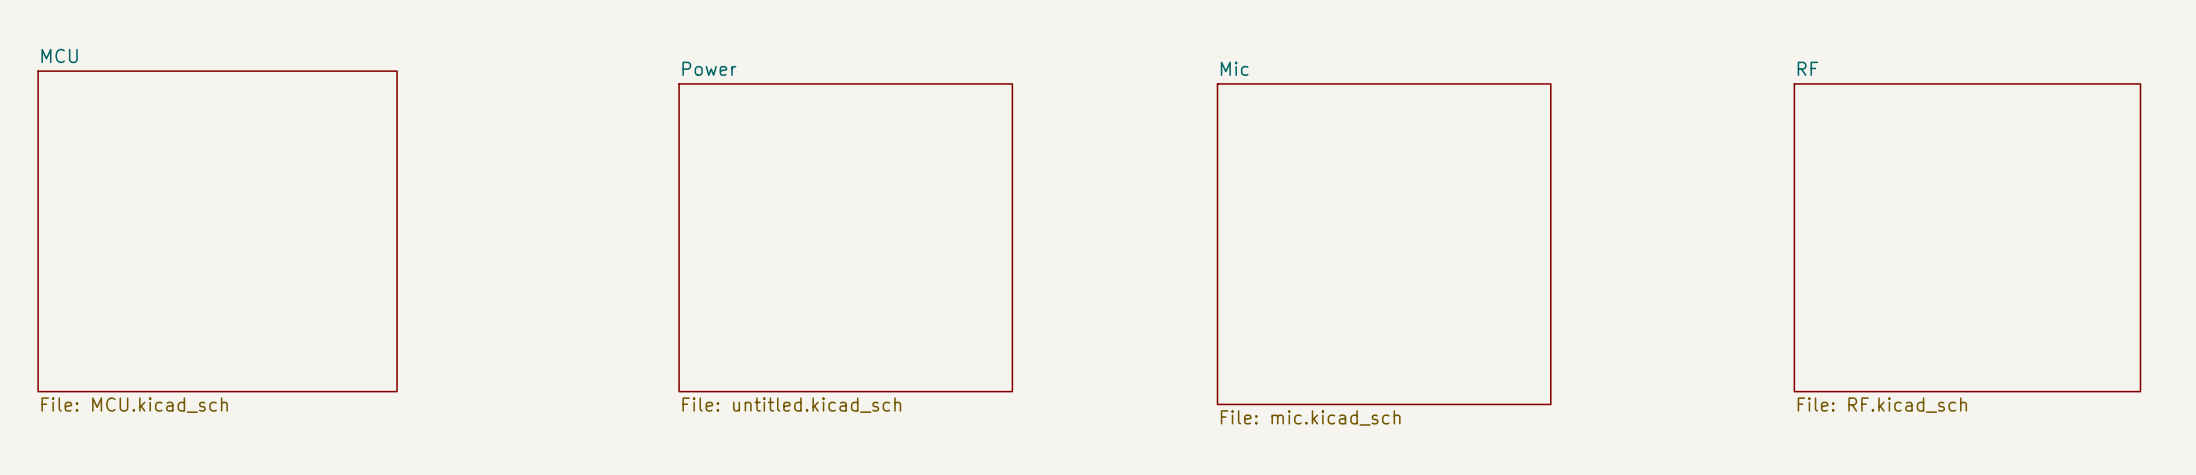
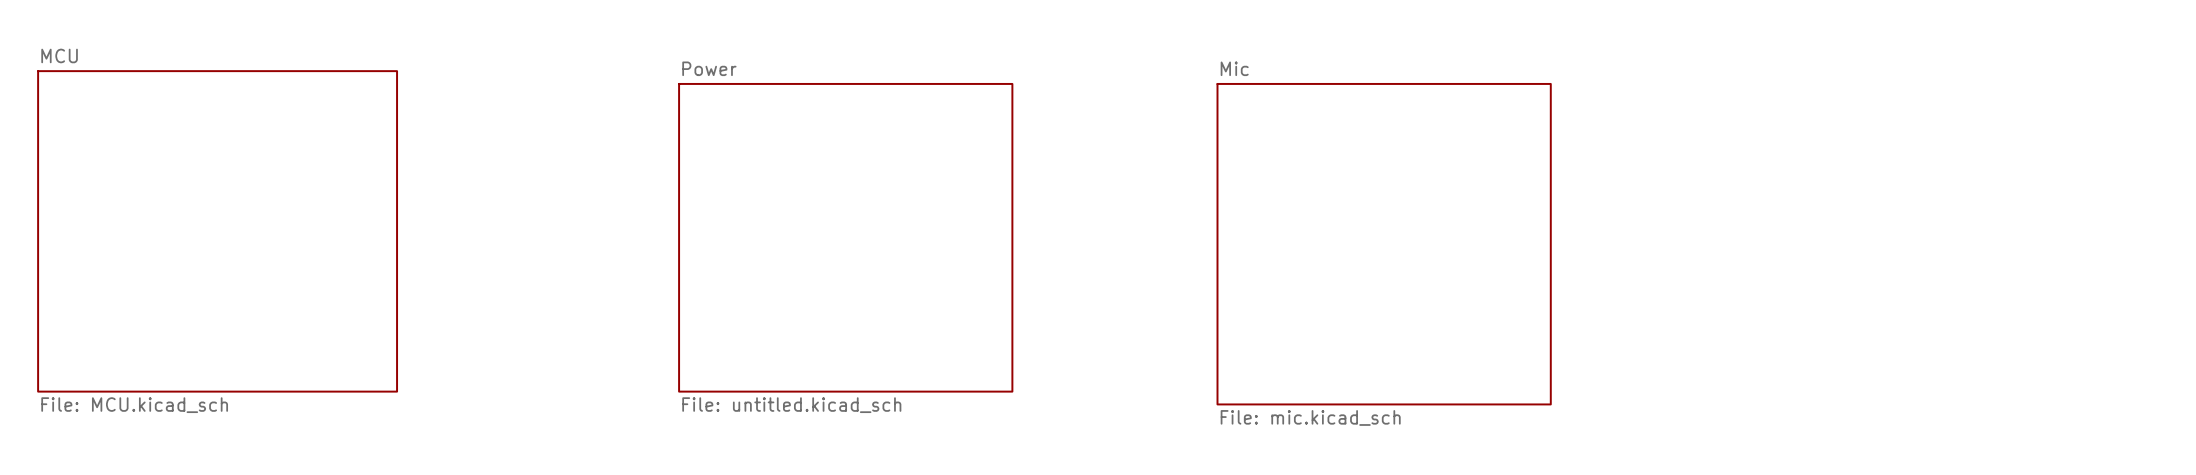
sheet RF: File: RF.kicad_sch (1967, 237) -> none

